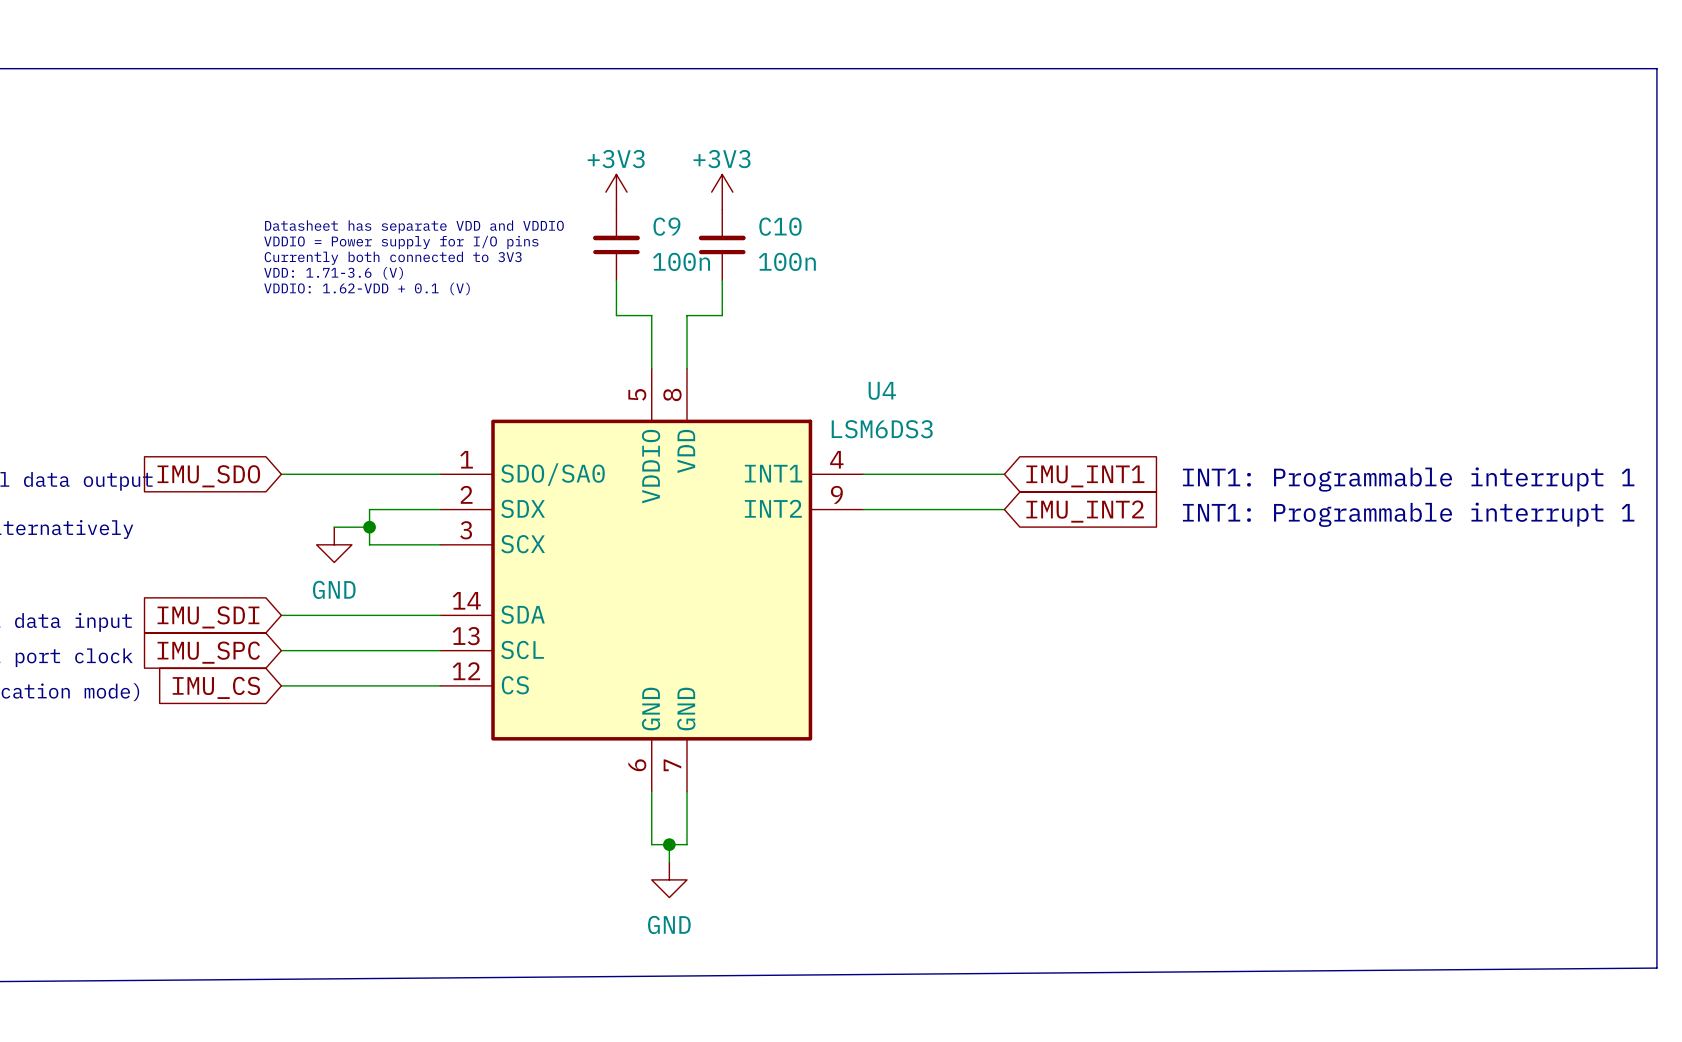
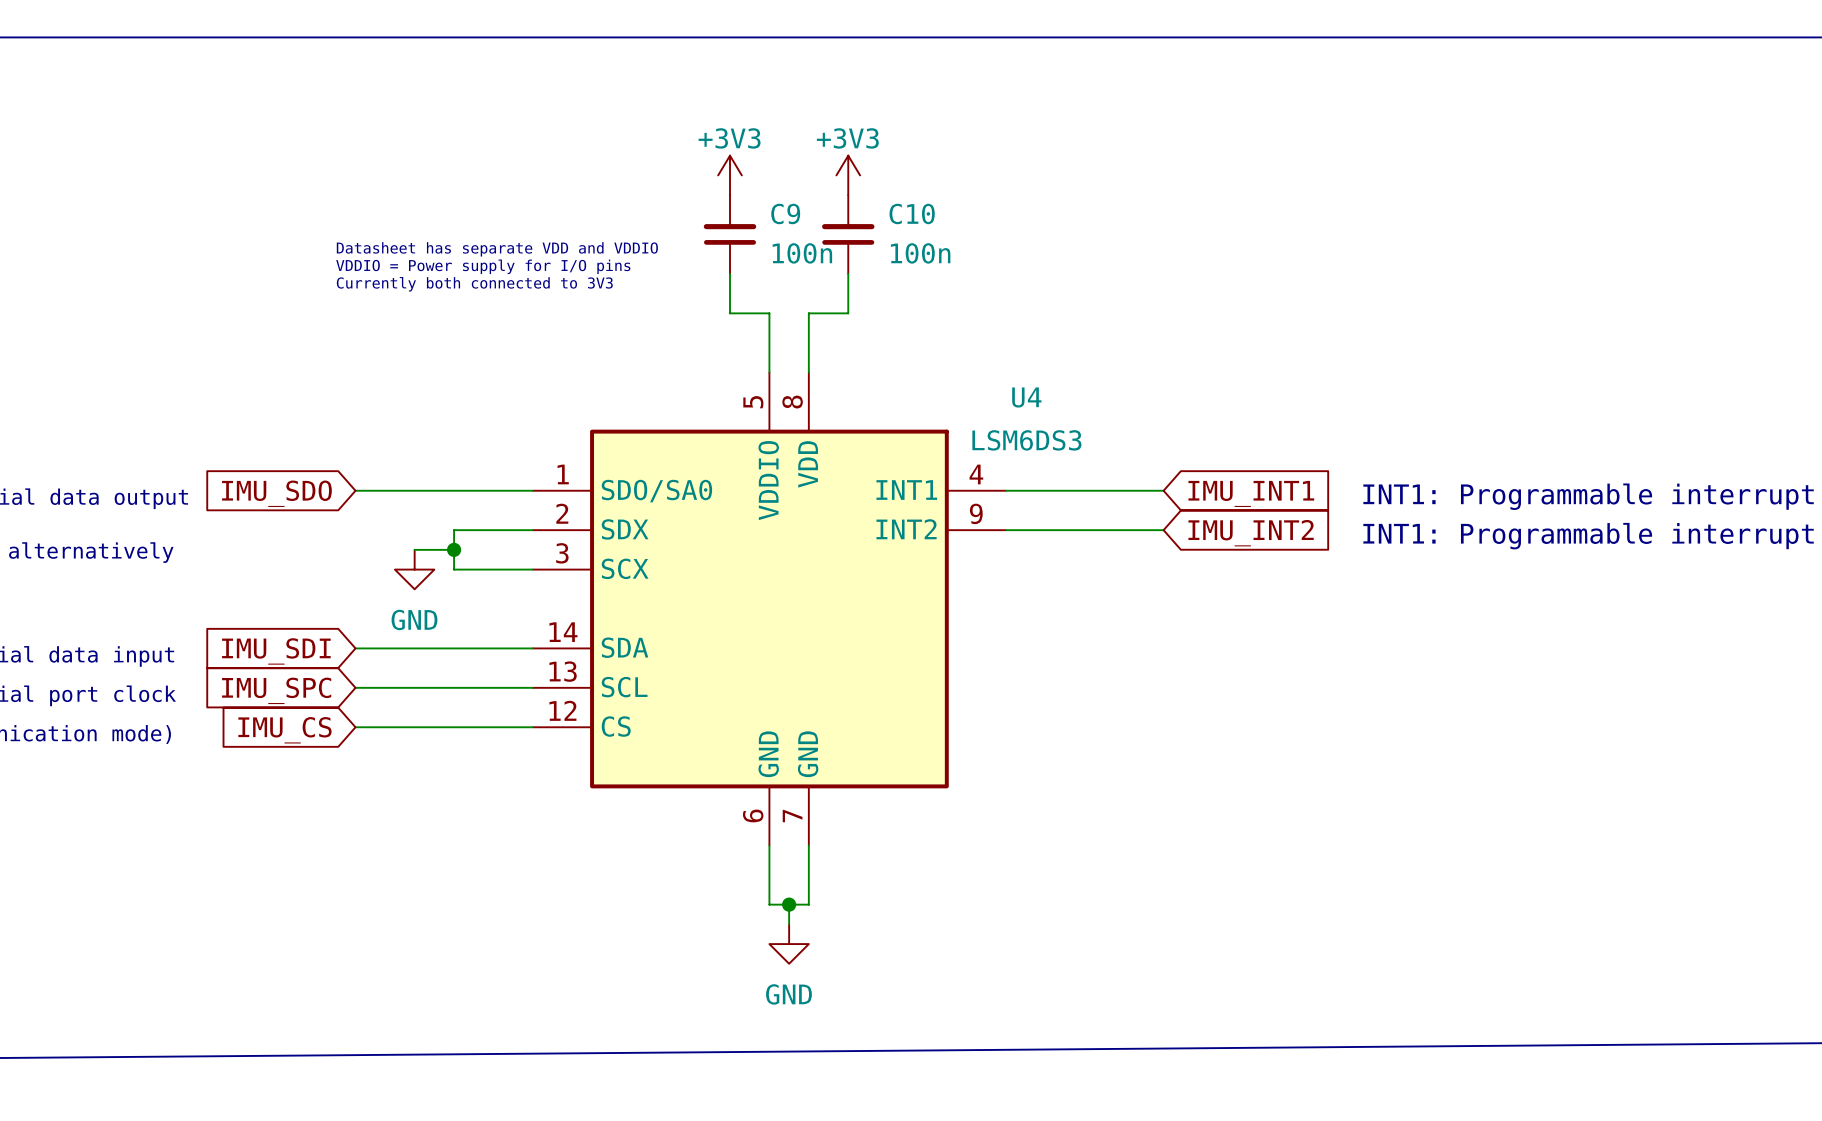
text: Datasheet has separate VDD and VDDIO (414, 226) -> none
text: VDDIO = Power supply for I/O pins (401, 242) -> none
text: Currently both connected to 3V3 (393, 258) -> Datasheet has separate VDD and VDDIO (497, 249)
text: VDD: 1.71-3.6 (V) (333, 273) -> VDDIO = Power supply for I/O pins (483, 266)
text: VDDIO: 1.62-VDD + 0.1 (V) (367, 288) -> Currently both connected to 3V3 (474, 284)

